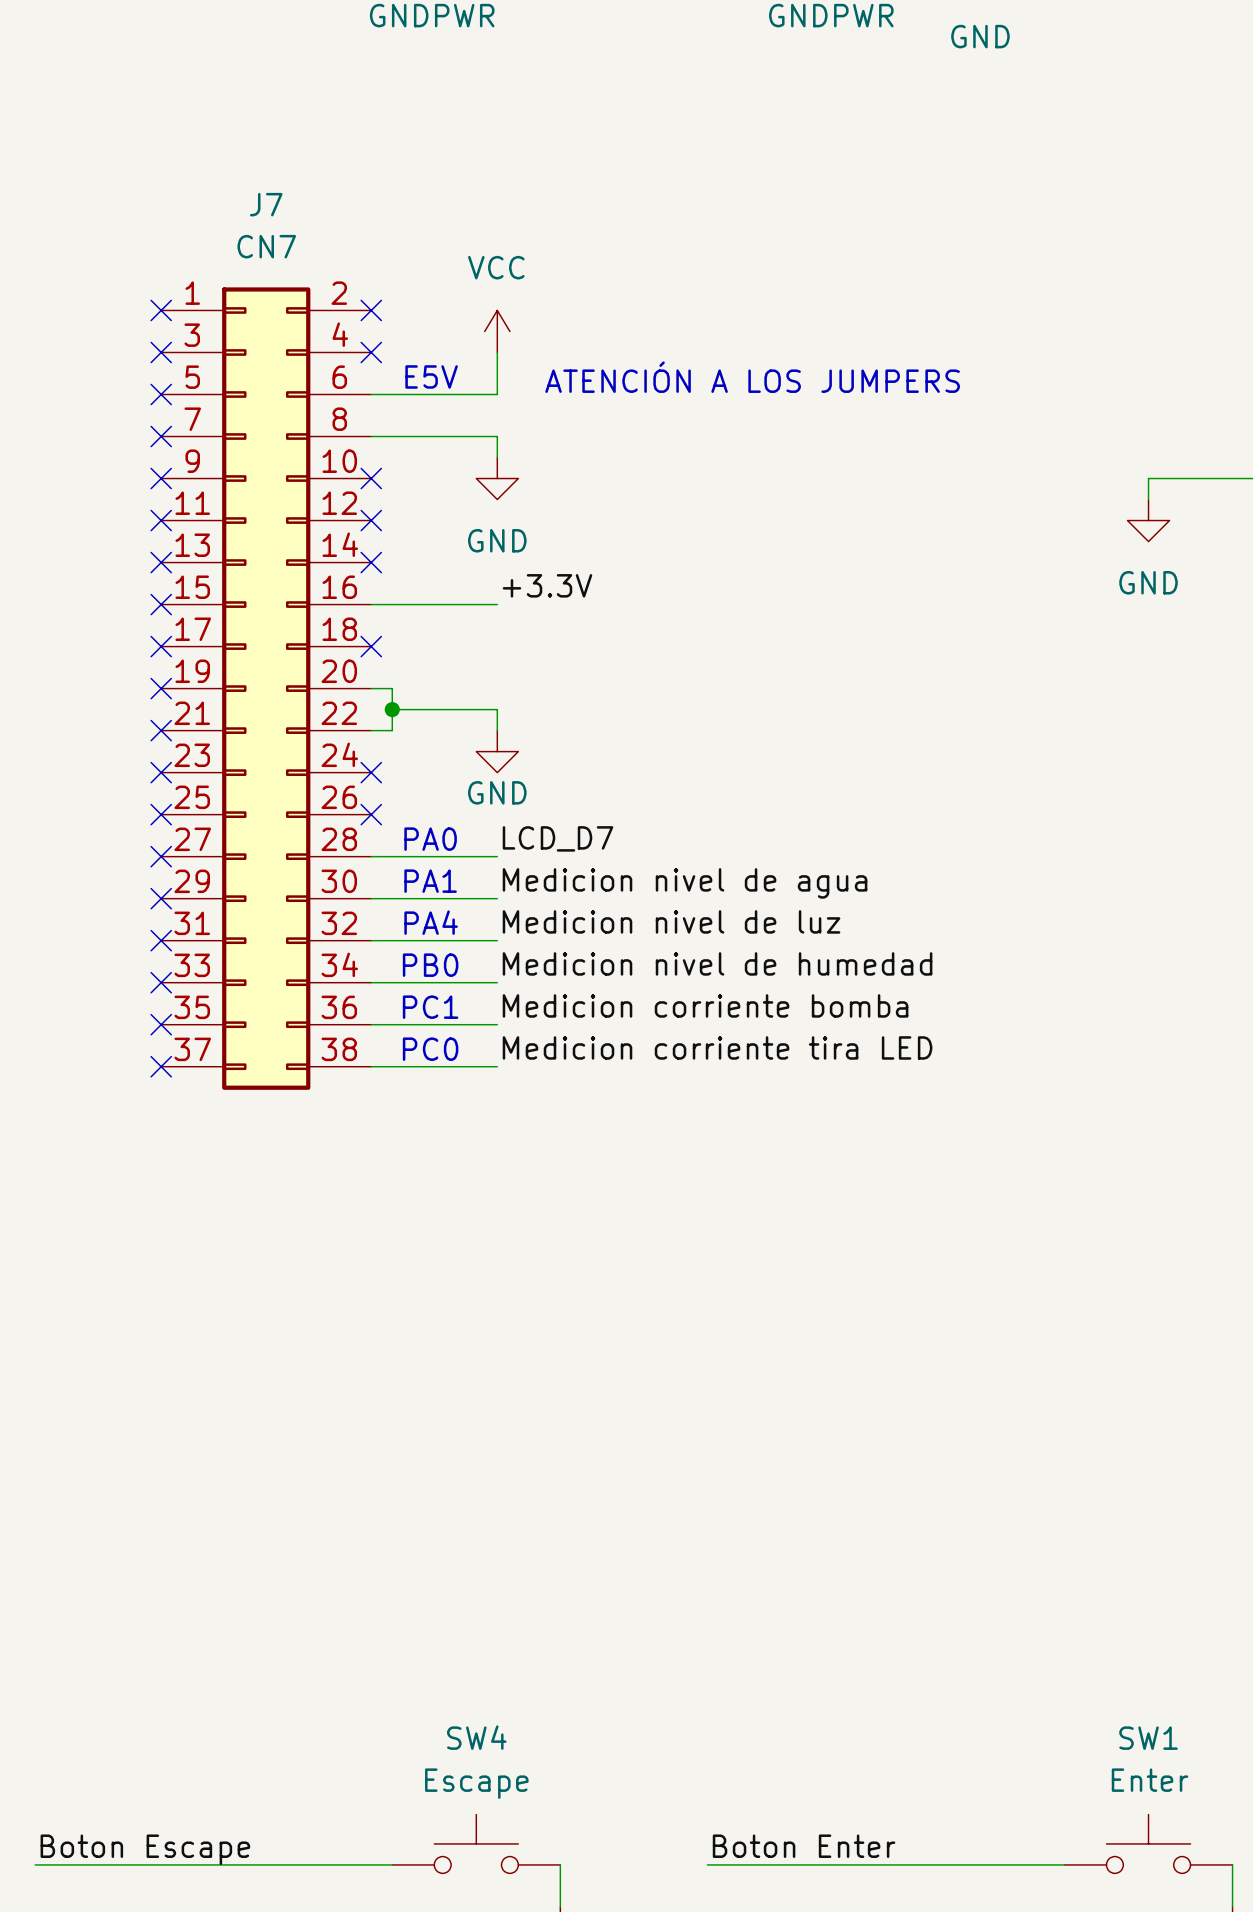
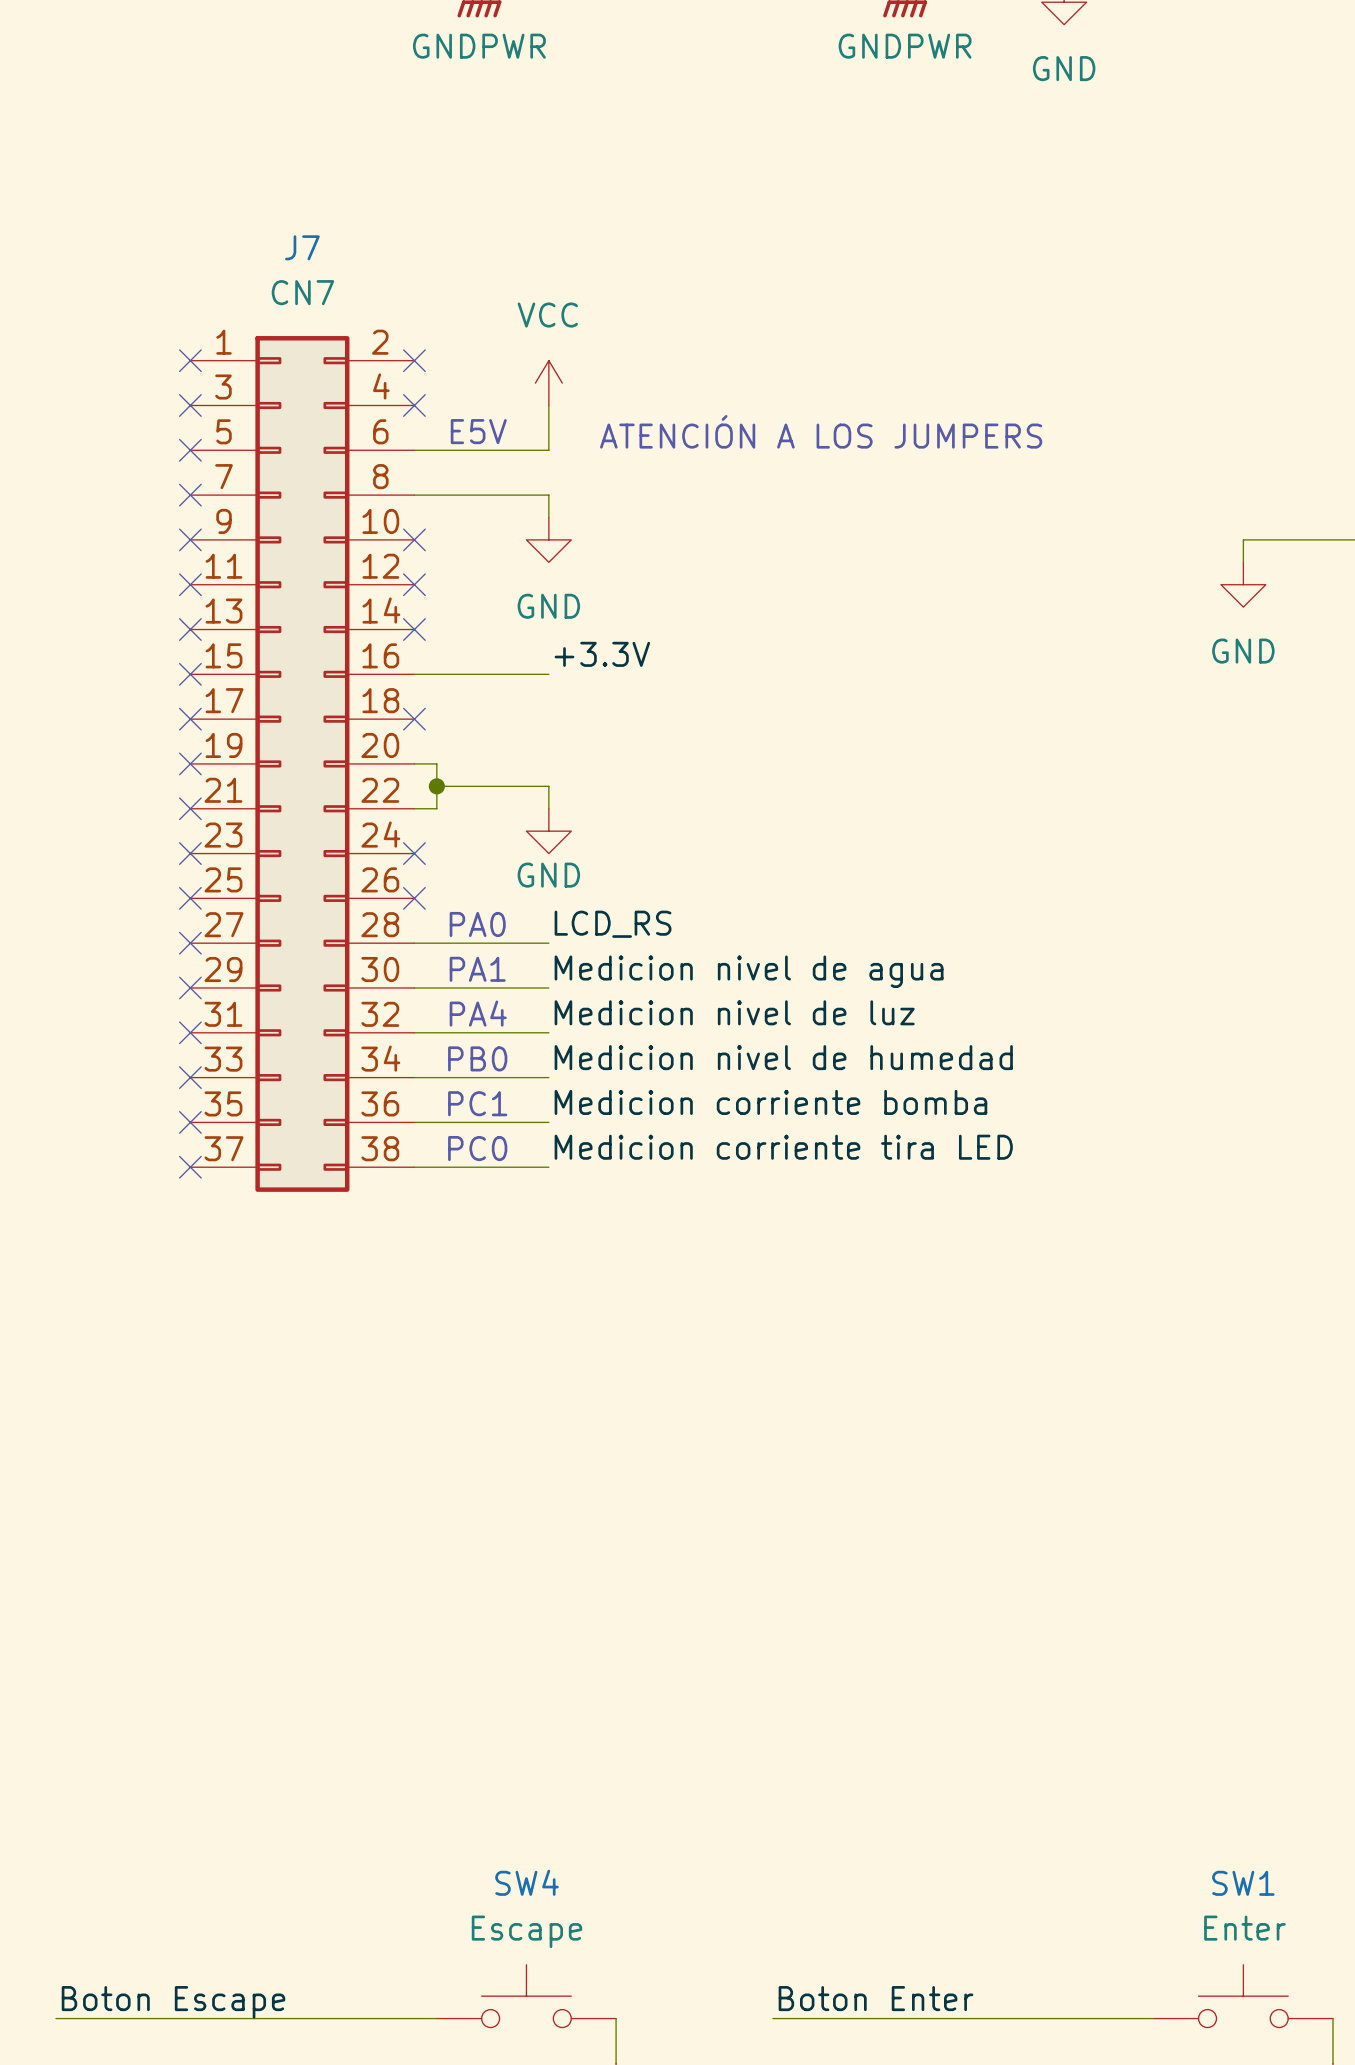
label: LCD_D7 (557, 838) -> LCD_RS (613, 924)

